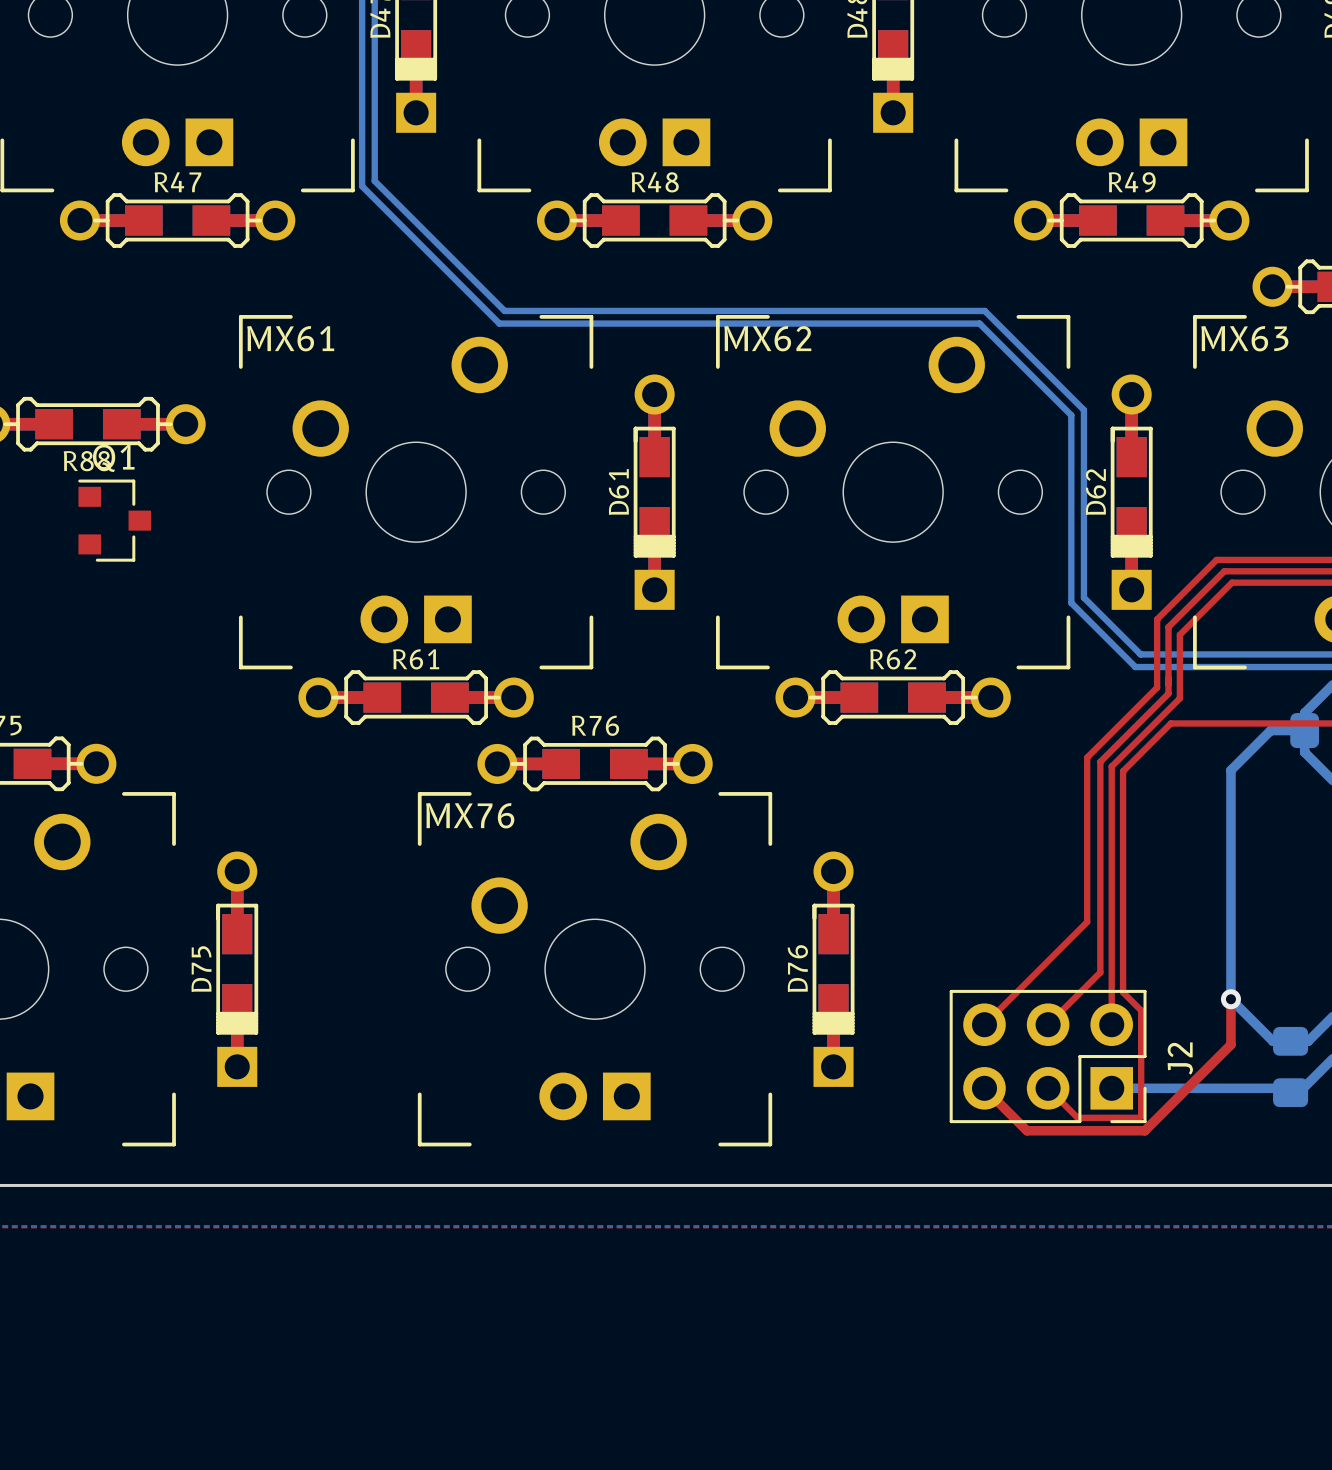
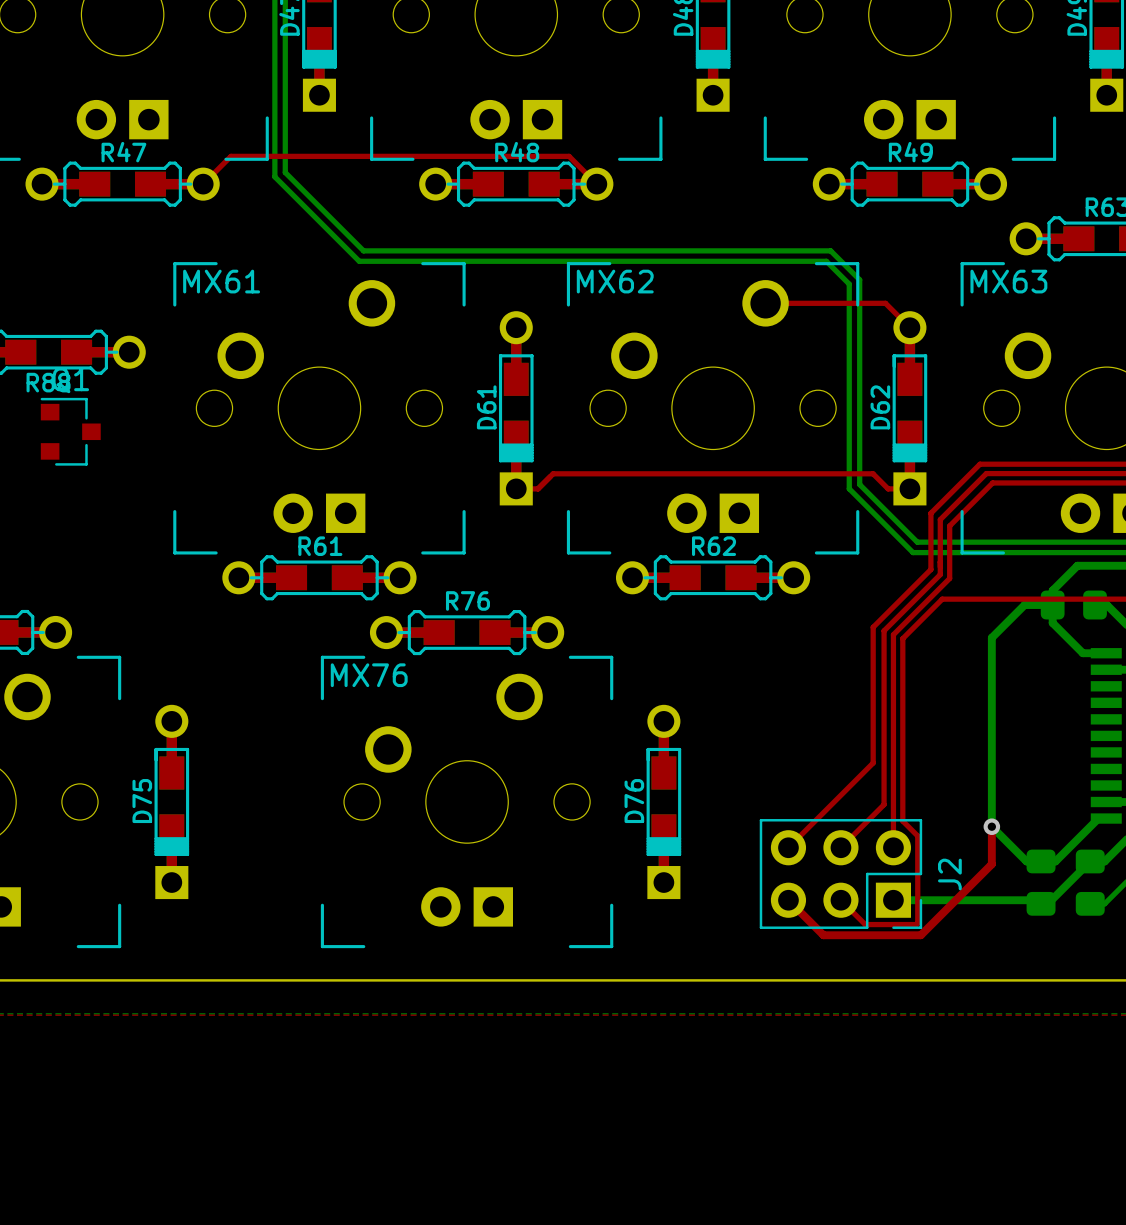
bottom track: (374, 181) (504, 310) (984, 310) (1083, 410) (1083, 597) -> (285, 151) (285, 172) (363, 250) (830, 250) (859, 279) (859, 484) (870, 495)
bottom track: (362, 186) (499, 323) (979, 323) (1071, 415) (1071, 602) -> (274, 155) (274, 176) (359, 261) (826, 261) (849, 284) (849, 488) (860, 499)
top track: none -> (203, 184) (230, 156) (569, 156) (596, 184)
top track: none -> (765, 303) (885, 303) (909, 327)
top track: none -> (516, 488) (538, 488) (553, 473) (873, 473) (888, 488) (909, 488)

